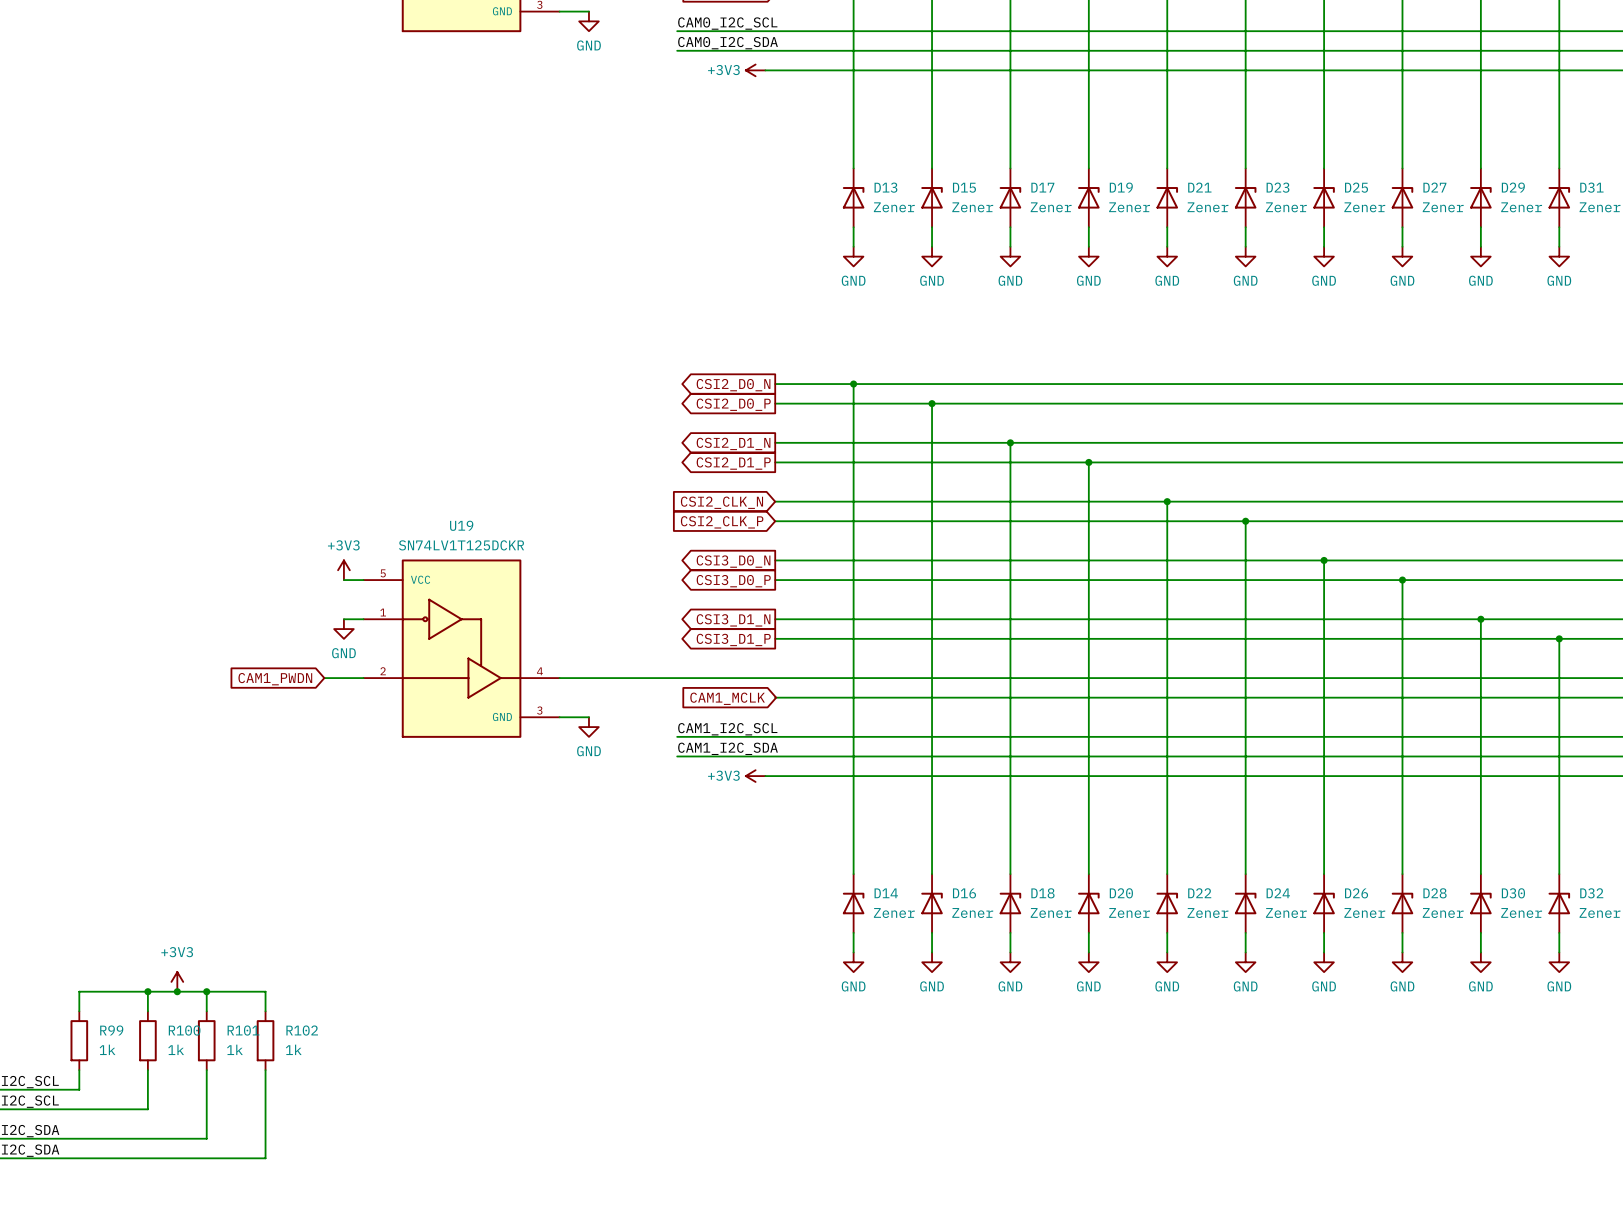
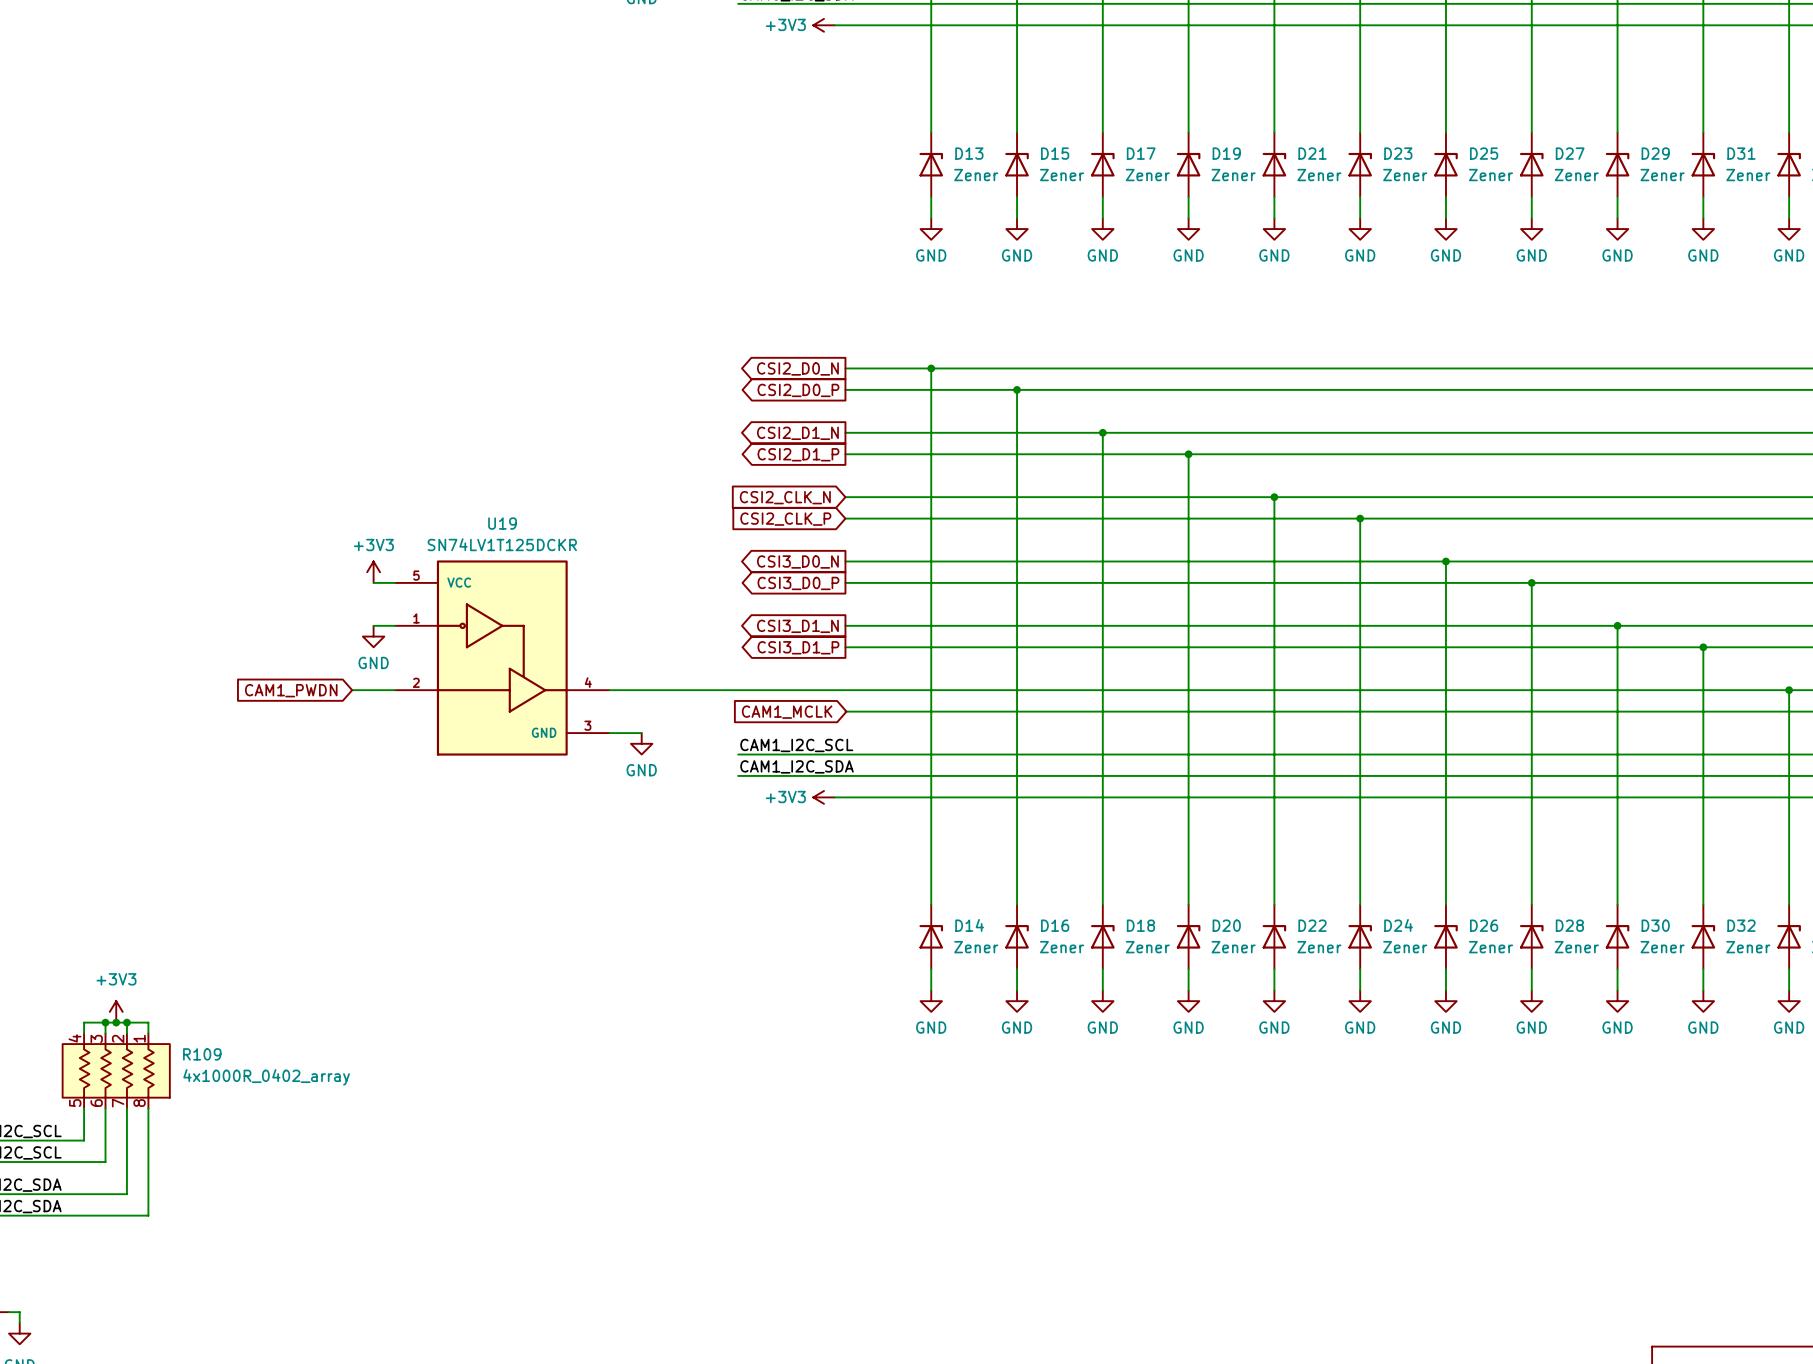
wire: none -> (105, 1022) (105, 1033)
junction: none -> (105, 1022)
junction: none -> (116, 1022)
wire: none -> (126, 1022) (126, 1033)
junction: none -> (126, 1022)
power symbol position: +3V3 (177, 981) -> +3V3 (116, 1011)
wire: none -> (84, 1033) (84, 1022) (148, 1022) (148, 1033)
junction: (147, 991) -> none
junction: (177, 991) -> none
wire: (206, 991) (206, 1011) -> none
junction: (206, 991) -> none
wire: (79, 1011) (79, 991) (265, 991) (265, 1011) -> none
R109: none -> 4x1000R_0402_array (116, 1070)
R99: 1k (79, 1040) -> none
R100: 1k (147, 1040) -> none
R101: 1k (206, 1040) -> none
R102: 1k (265, 1040) -> none
wire: (147, 1070) (147, 1109) (98, 1109) -> (105, 1108) (105, 1162)
wire: (206, 1070) (206, 1138) (118, 1138) -> (126, 1108) (126, 1194)
wire: (265, 1070) (265, 1158) (138, 1158) -> (148, 1108) (148, 1215)

